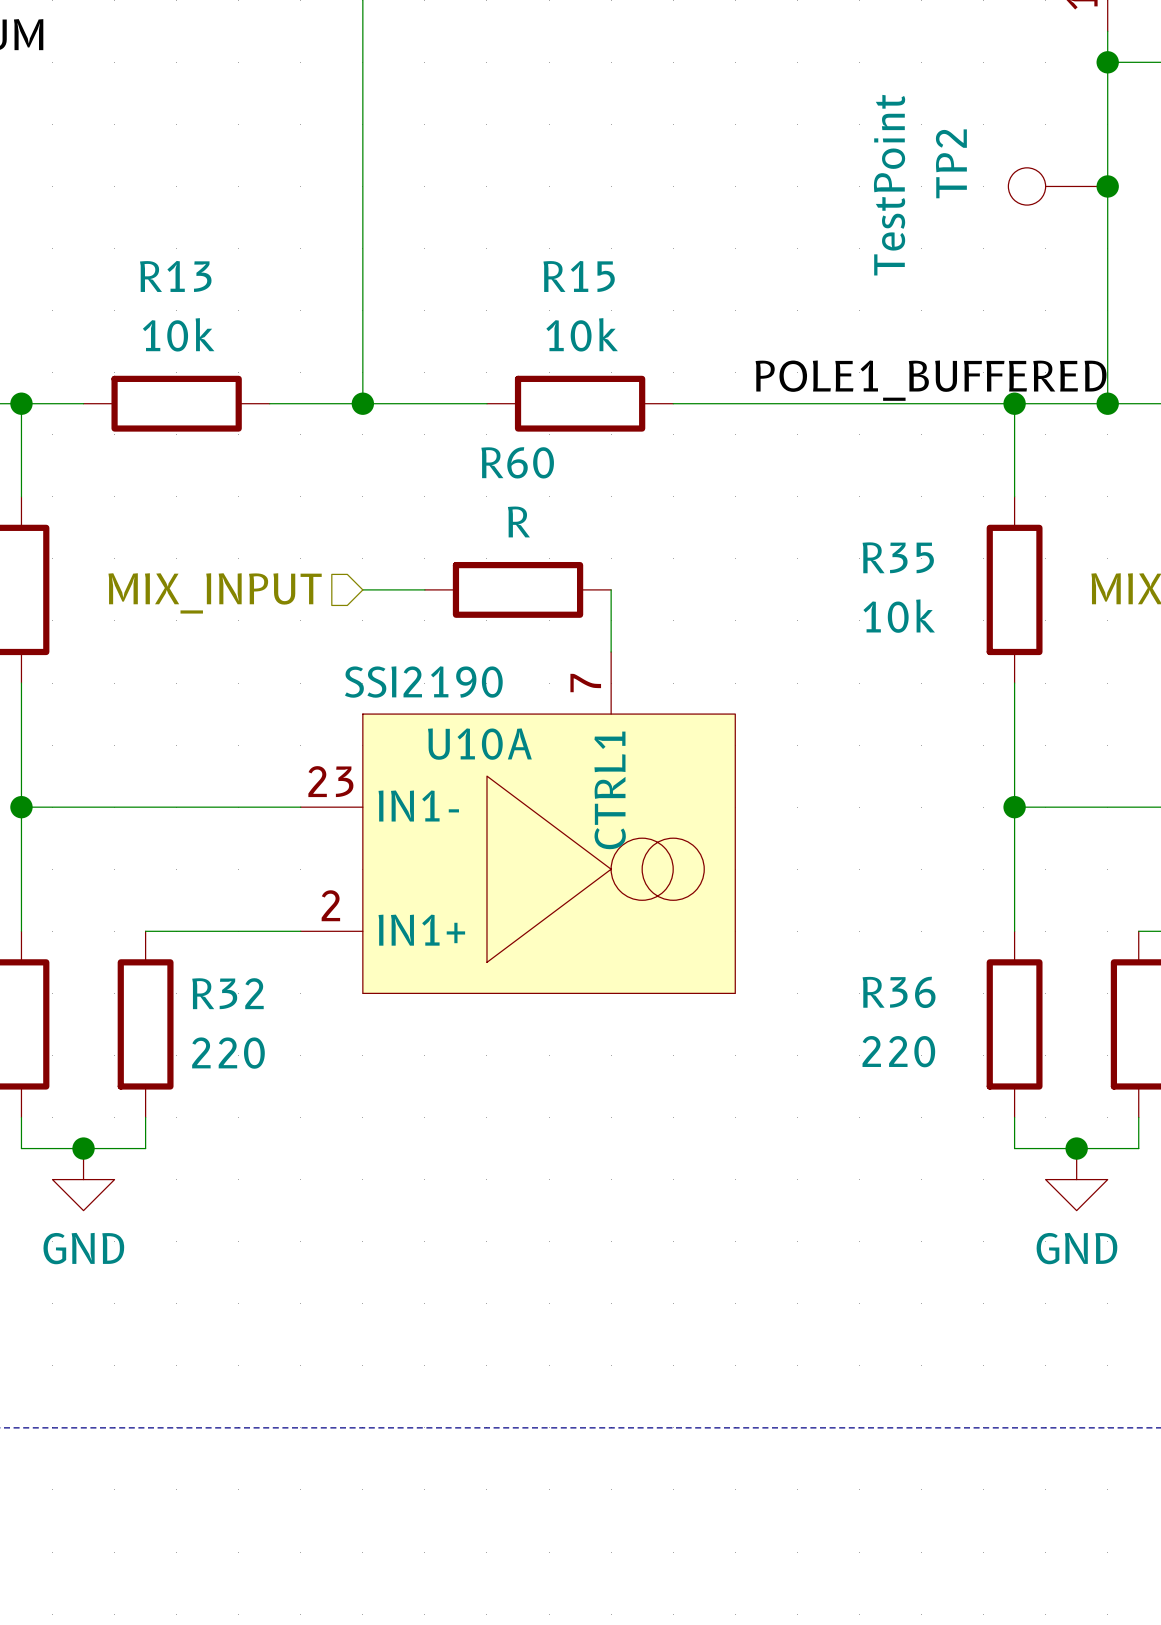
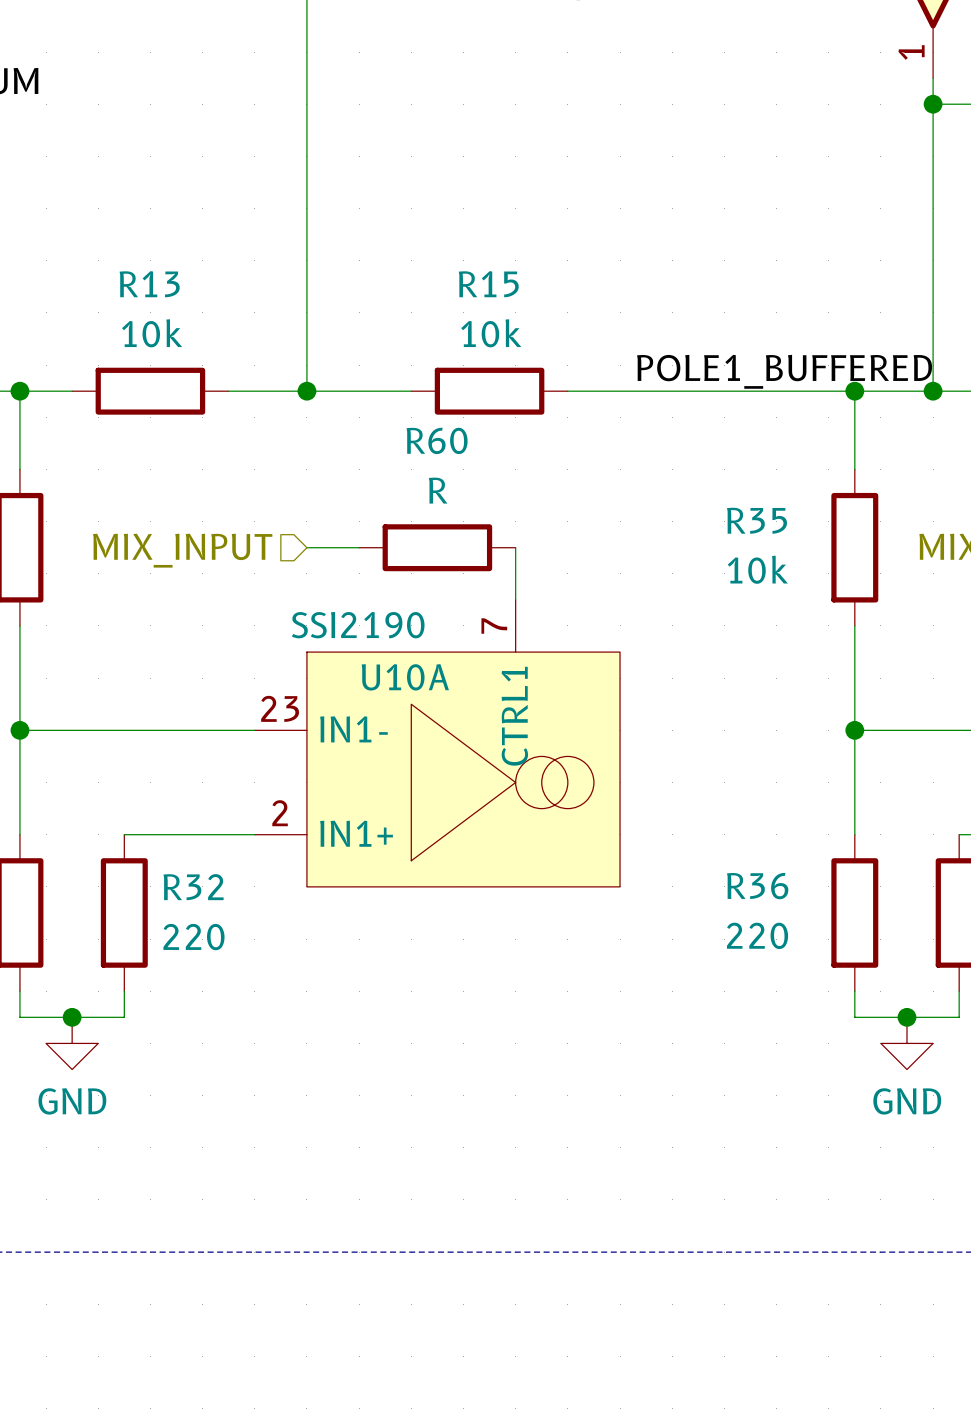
TP2: TestPoint (1058, 186) -> none
junction: (1107, 186) -> none

